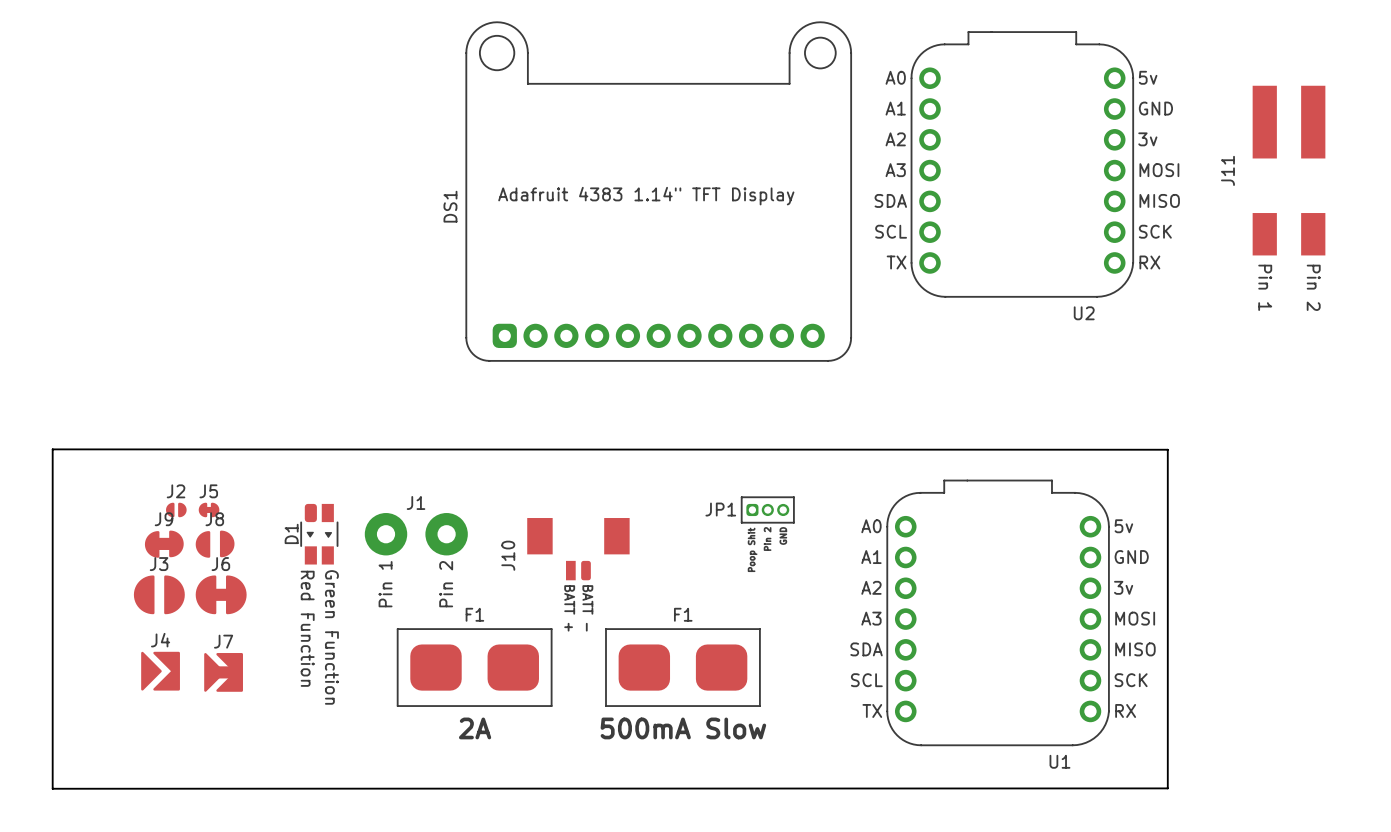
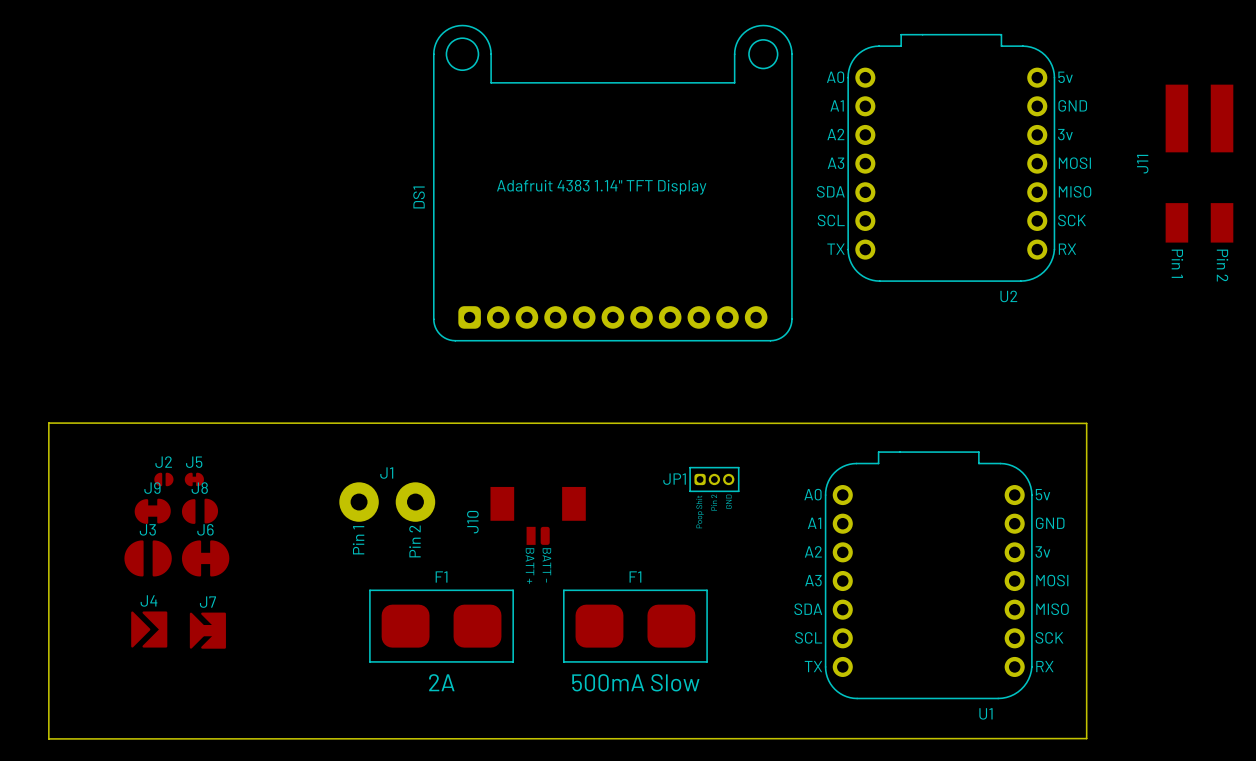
D1: (319, 534) -> none

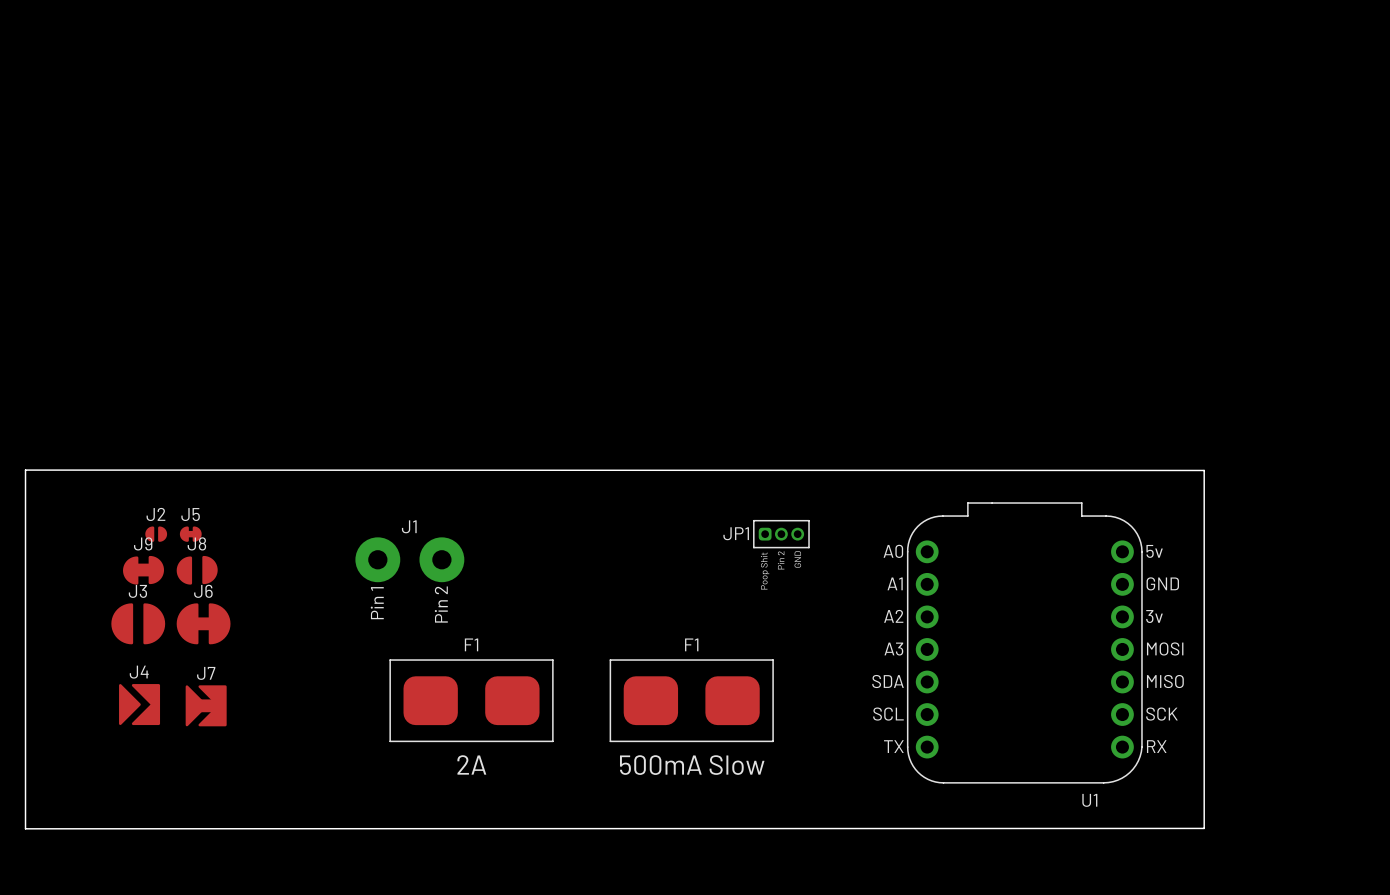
U2: (951, 157) -> none
J11: (1199, 163) -> none
DS1: (612, 183) -> none
J10: (538, 515) -> none

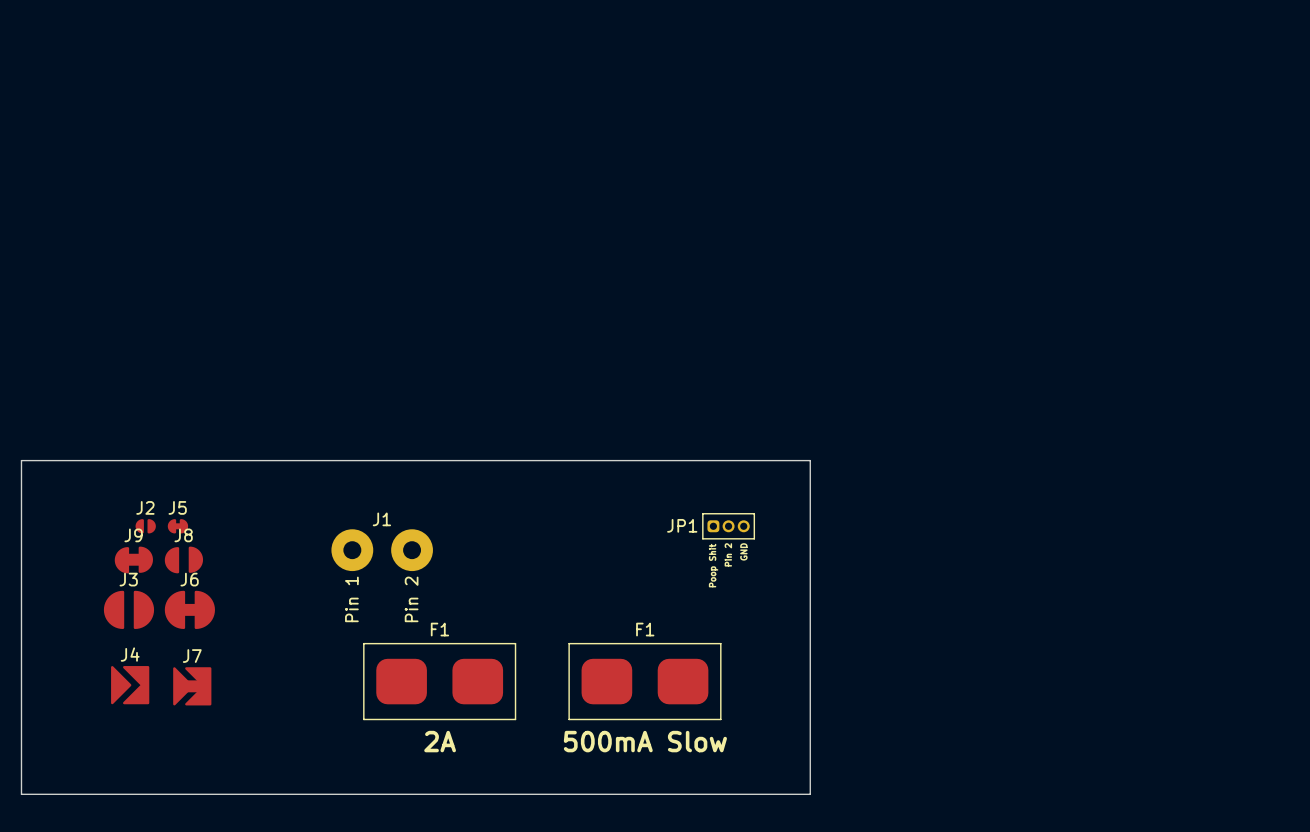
board edge: (25, 470) (25, 828) (1204, 828) (1204, 470) (25, 470) -> (21, 460) (21, 794) (810, 794) (810, 460) (21, 460)
U1: (1024, 642) -> none

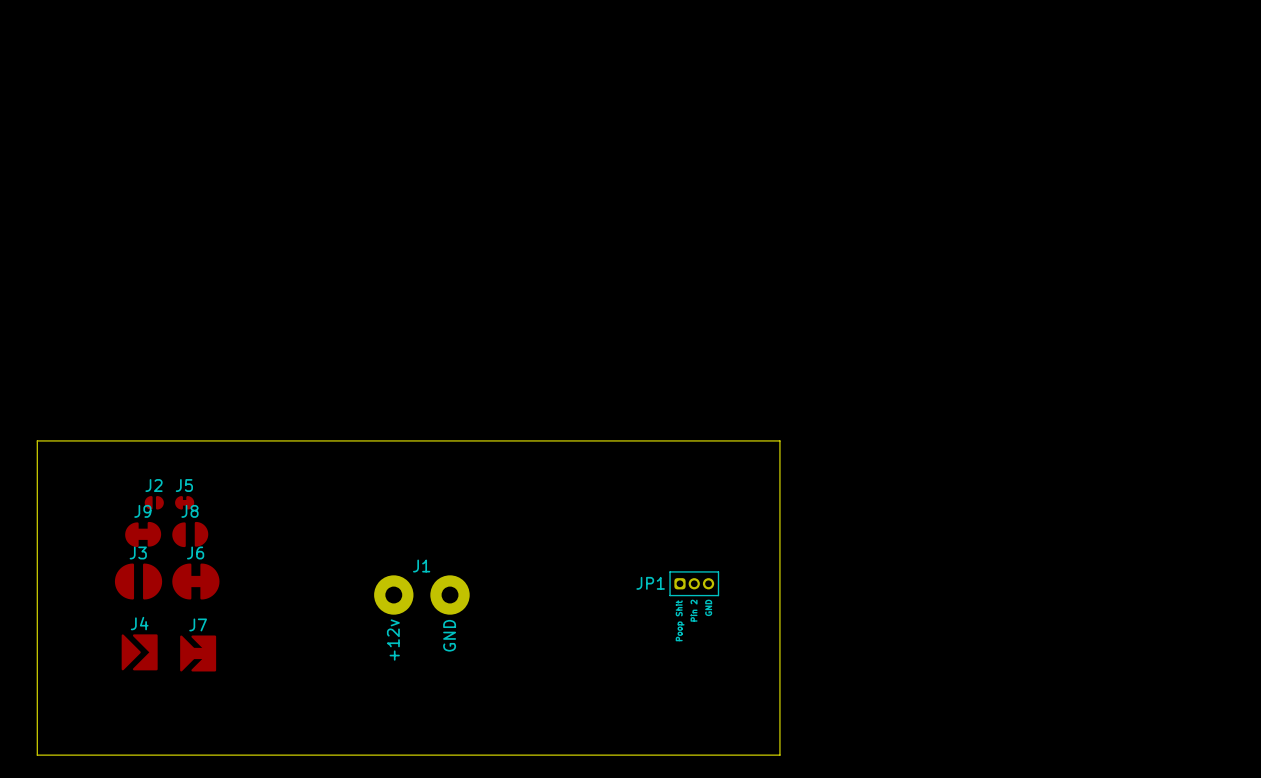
JP1 position: (728, 526) -> (694, 583)
J1 position: (382, 550) -> (421, 595)
J1 text: Pin 1 (351, 599) -> +12v (393, 640)
J1 text: Pin 2 (411, 599) -> GND (449, 635)
F1: (439, 681) -> none
F1: (644, 681) -> none

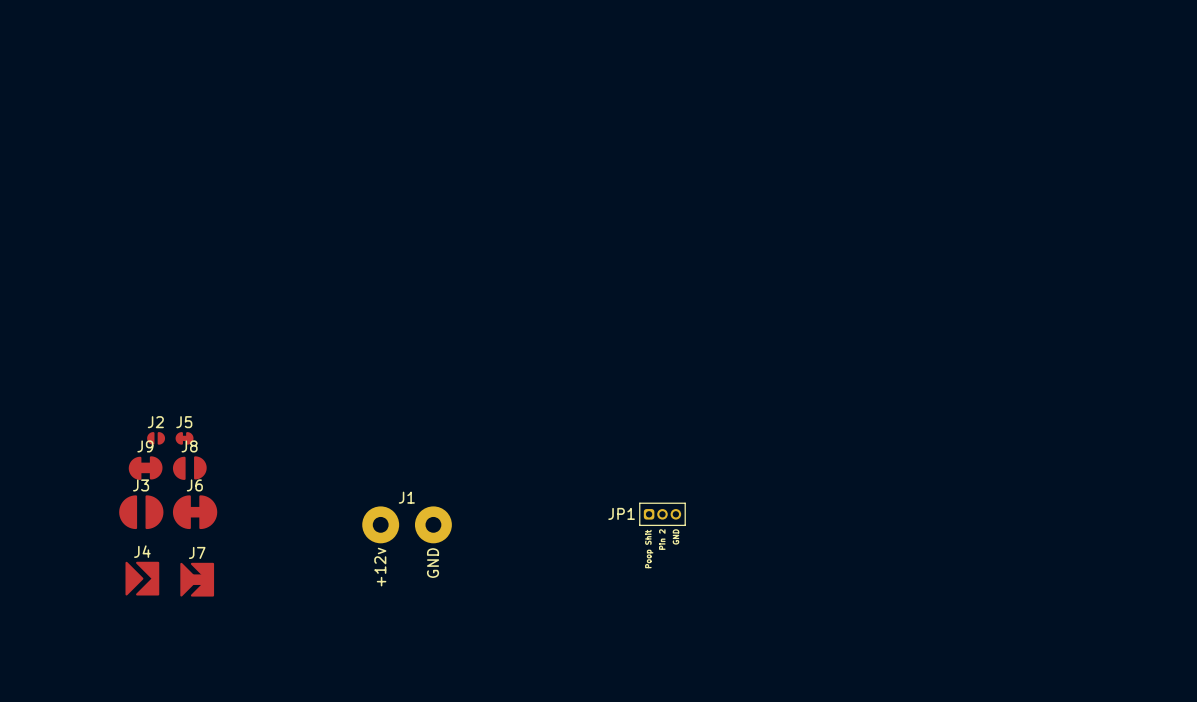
board edge: (37, 440) (37, 755) (779, 755) (779, 440) (37, 440) -> none

